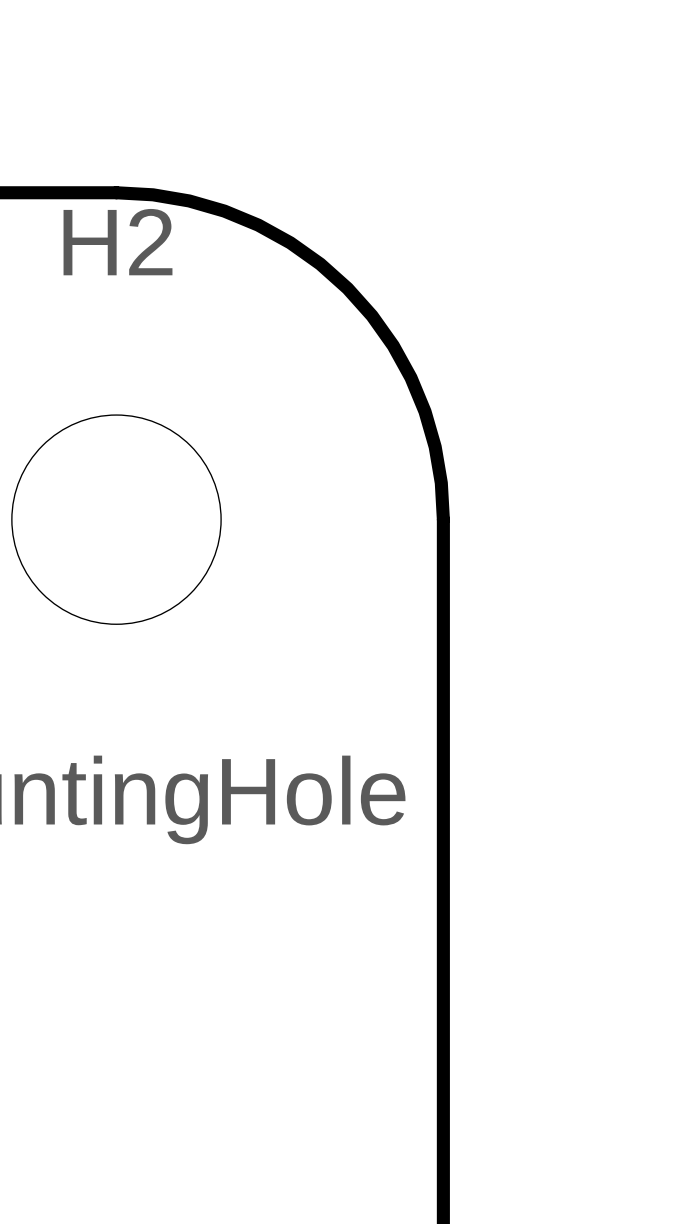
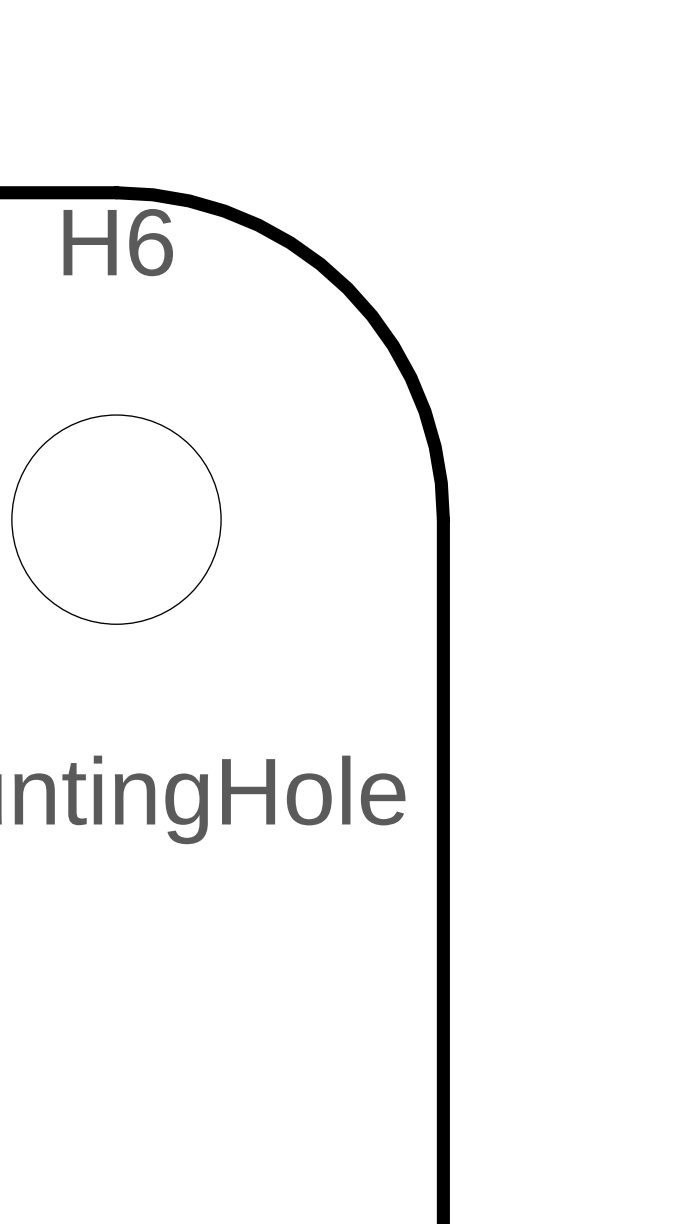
H2 name: H2 (118, 242) -> H6 (118, 242)

